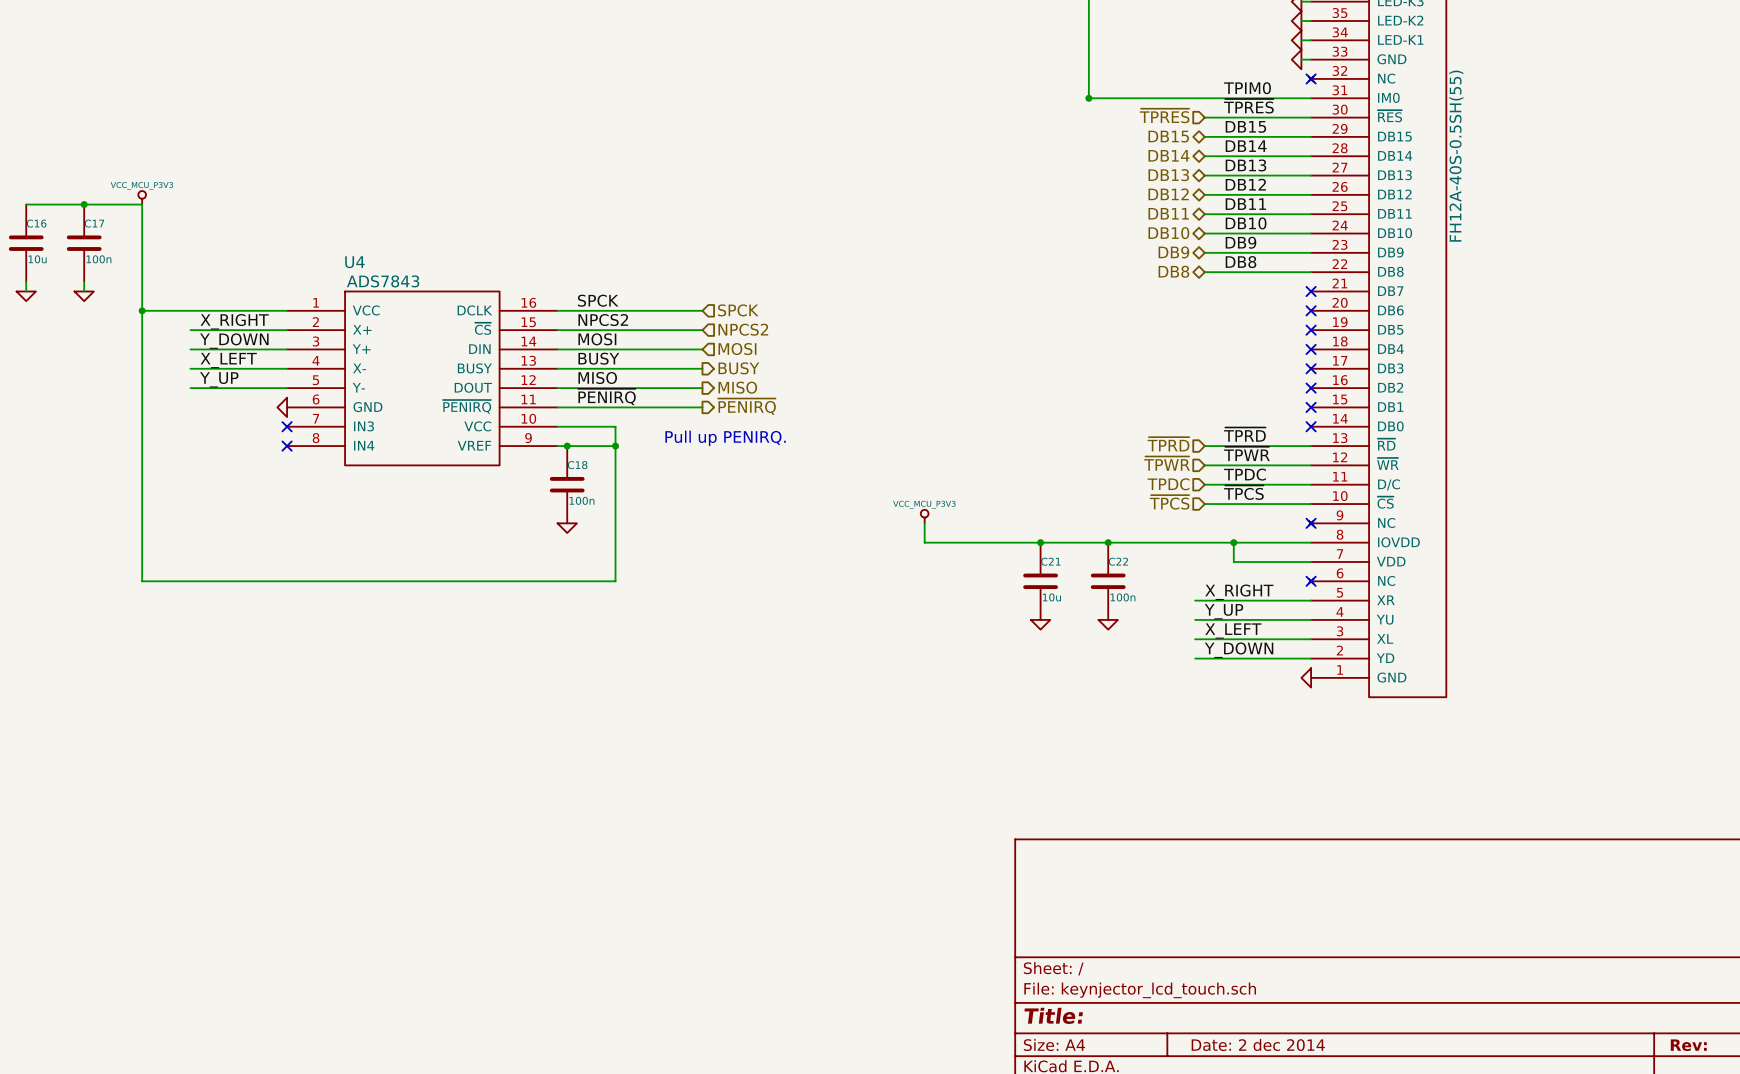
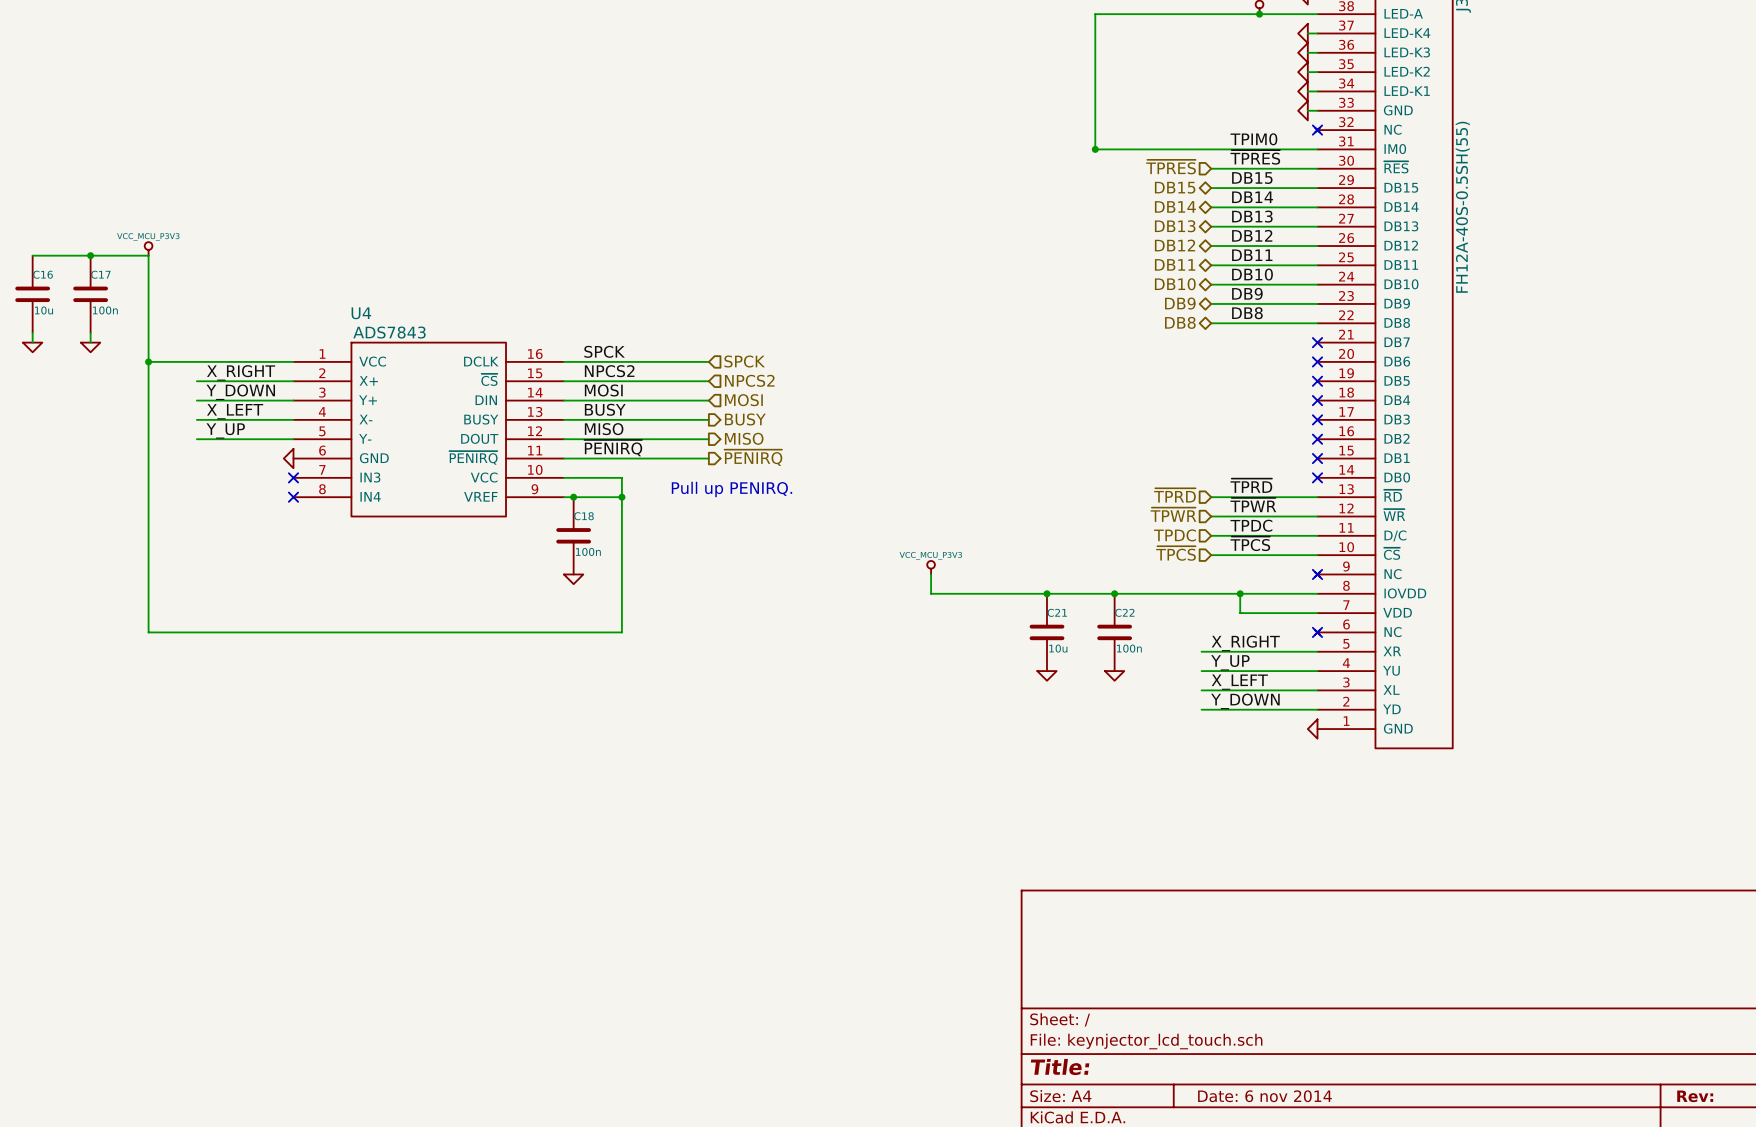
title block: Date: 2 dec 2014 (1258, 1044) -> Date: 6 nov 2014 (1264, 1096)

